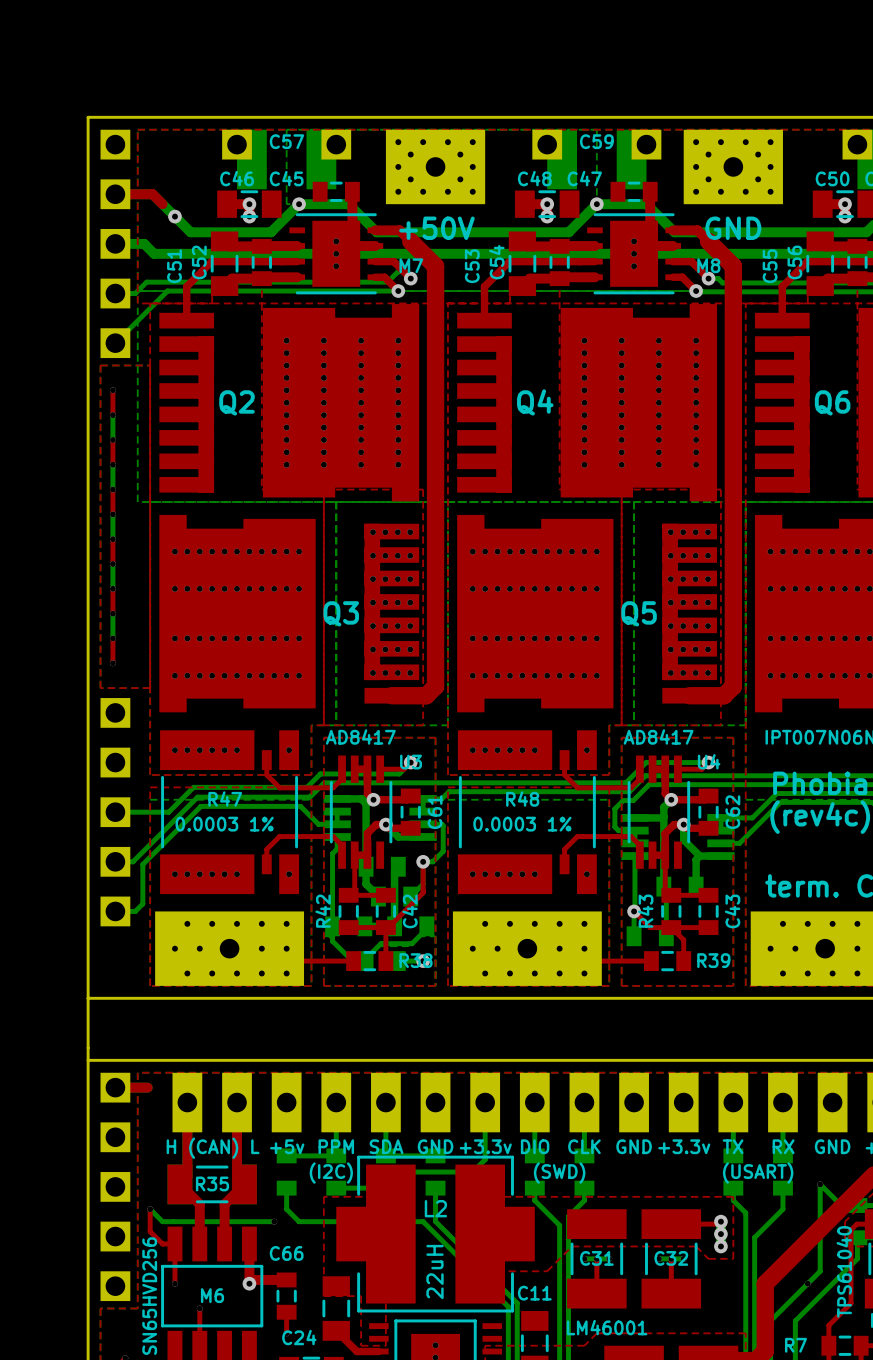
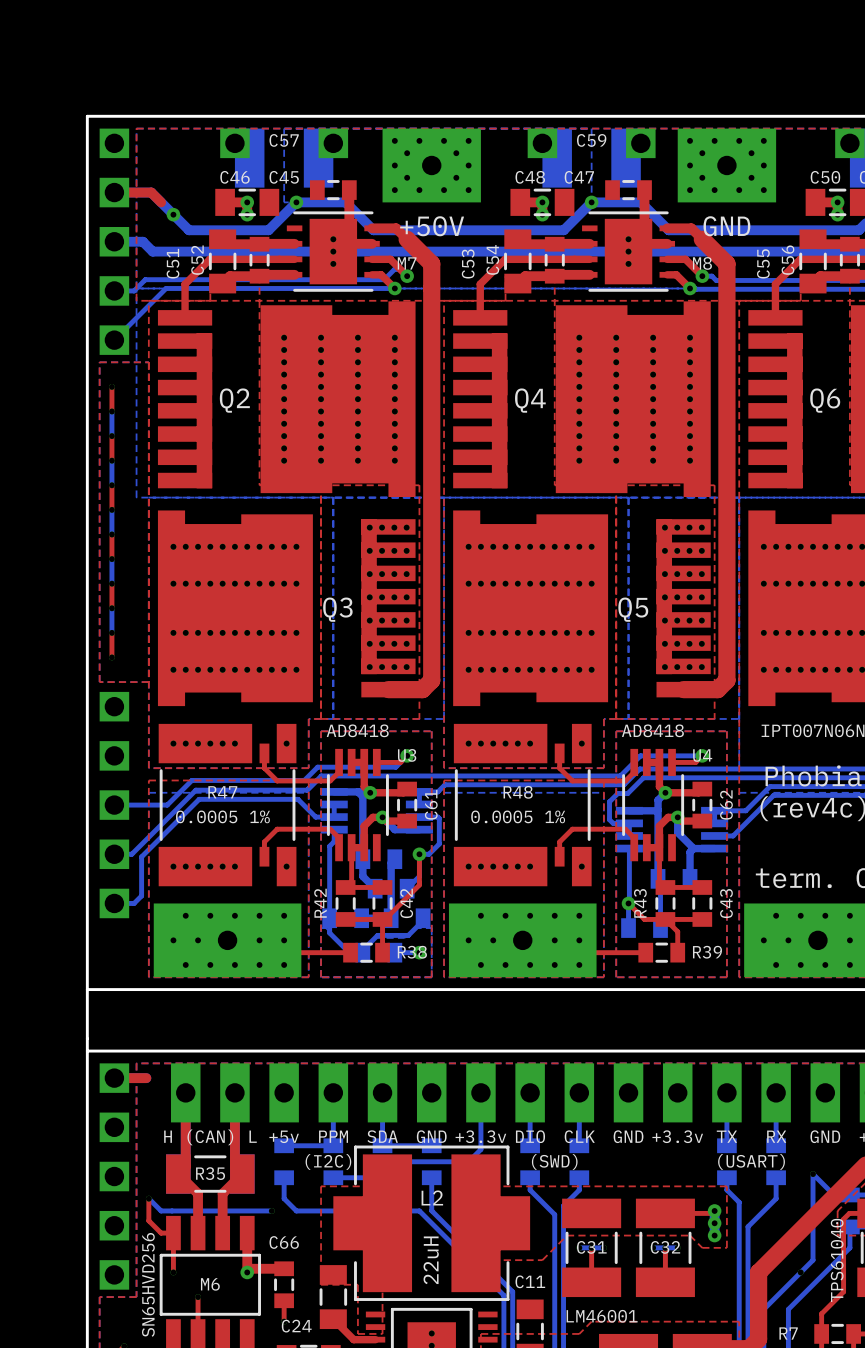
U3 value: AD8417 (360, 736) -> AD8418 (357, 730)
U4 value: AD8417 (658, 736) -> AD8418 (652, 730)
R47 value: 0.0003 1% (224, 824) -> 0.0005 1% (222, 816)
R48 value: 0.0003 1% (522, 824) -> 0.0005 1% (518, 816)

